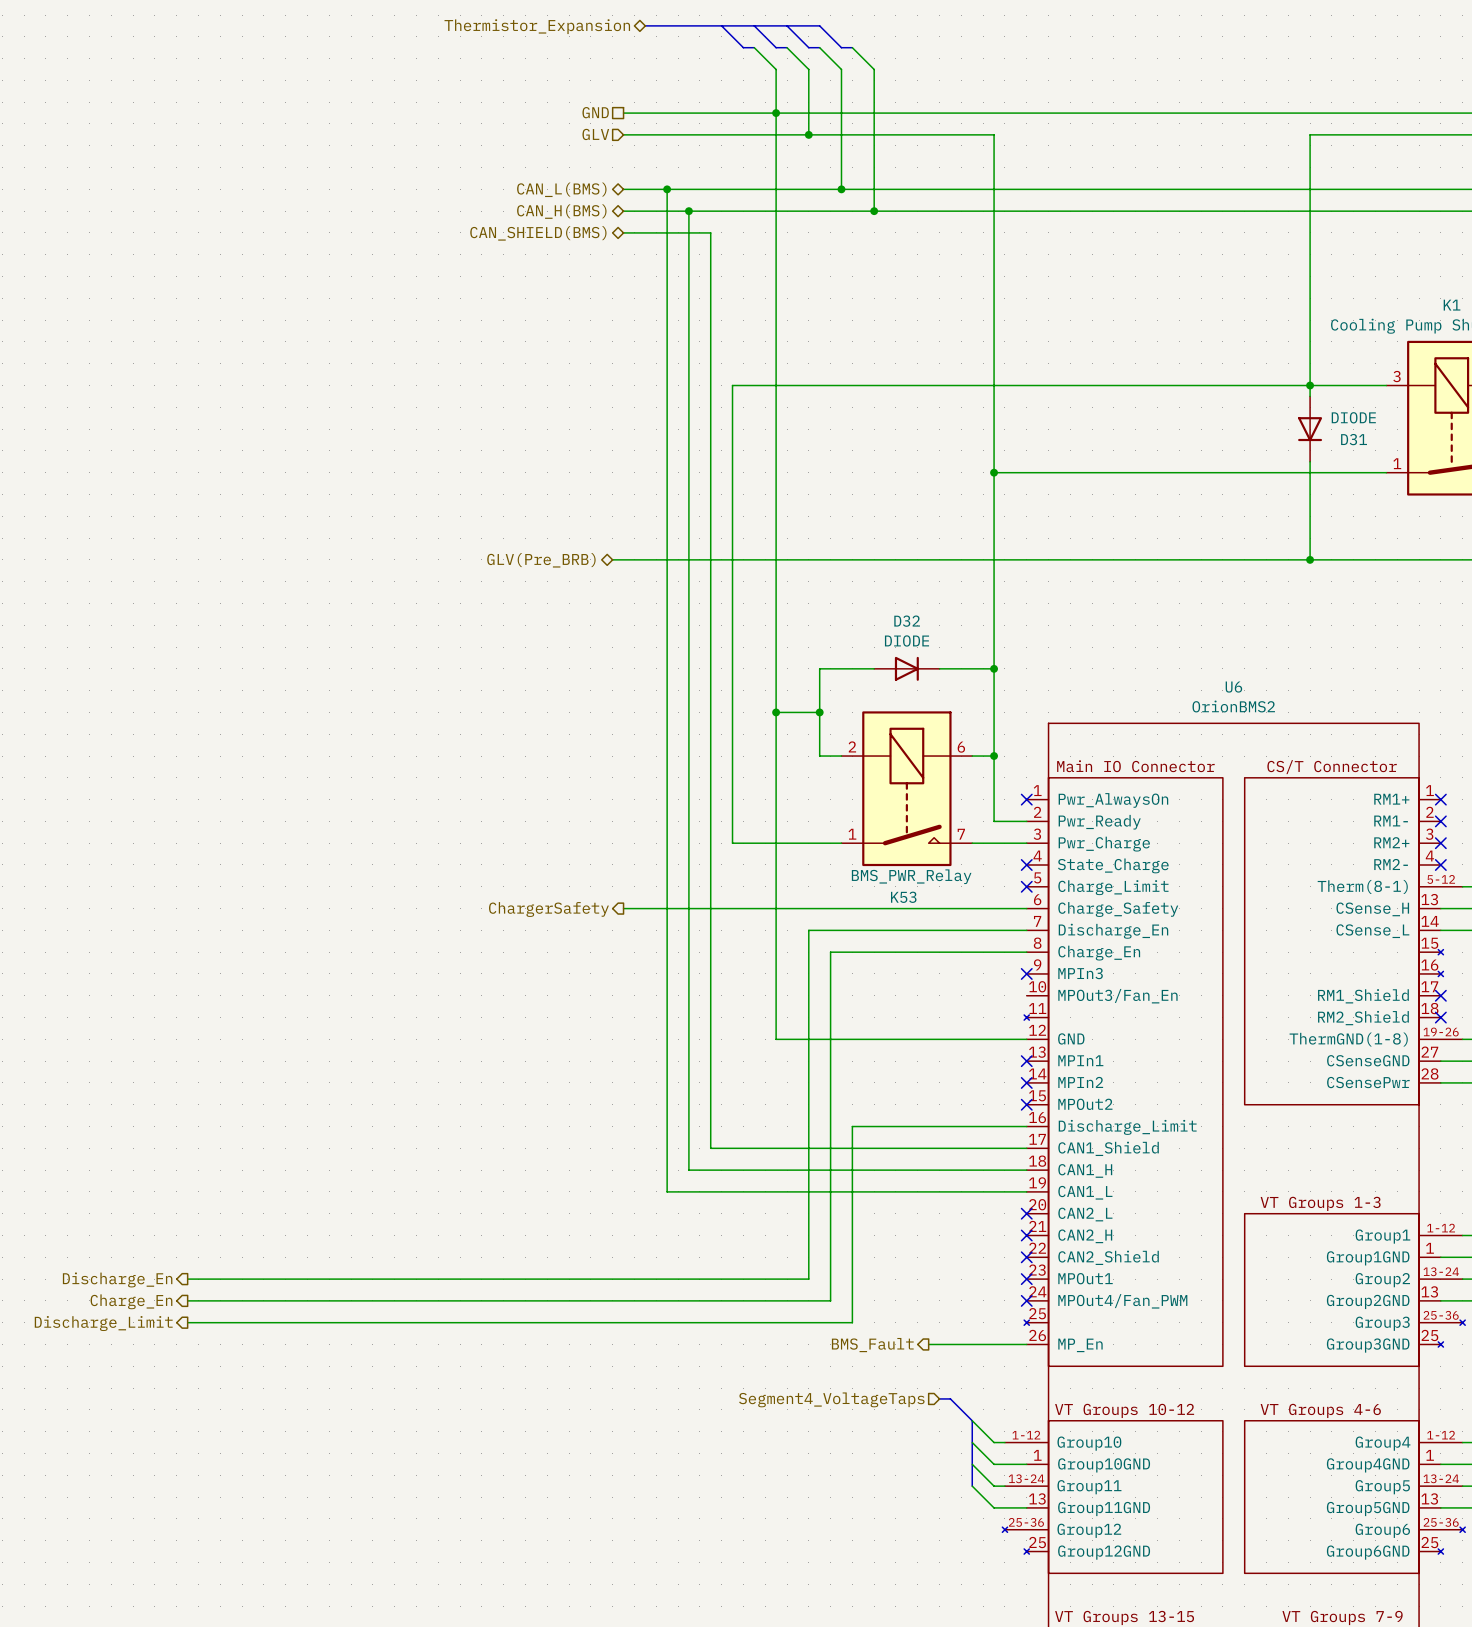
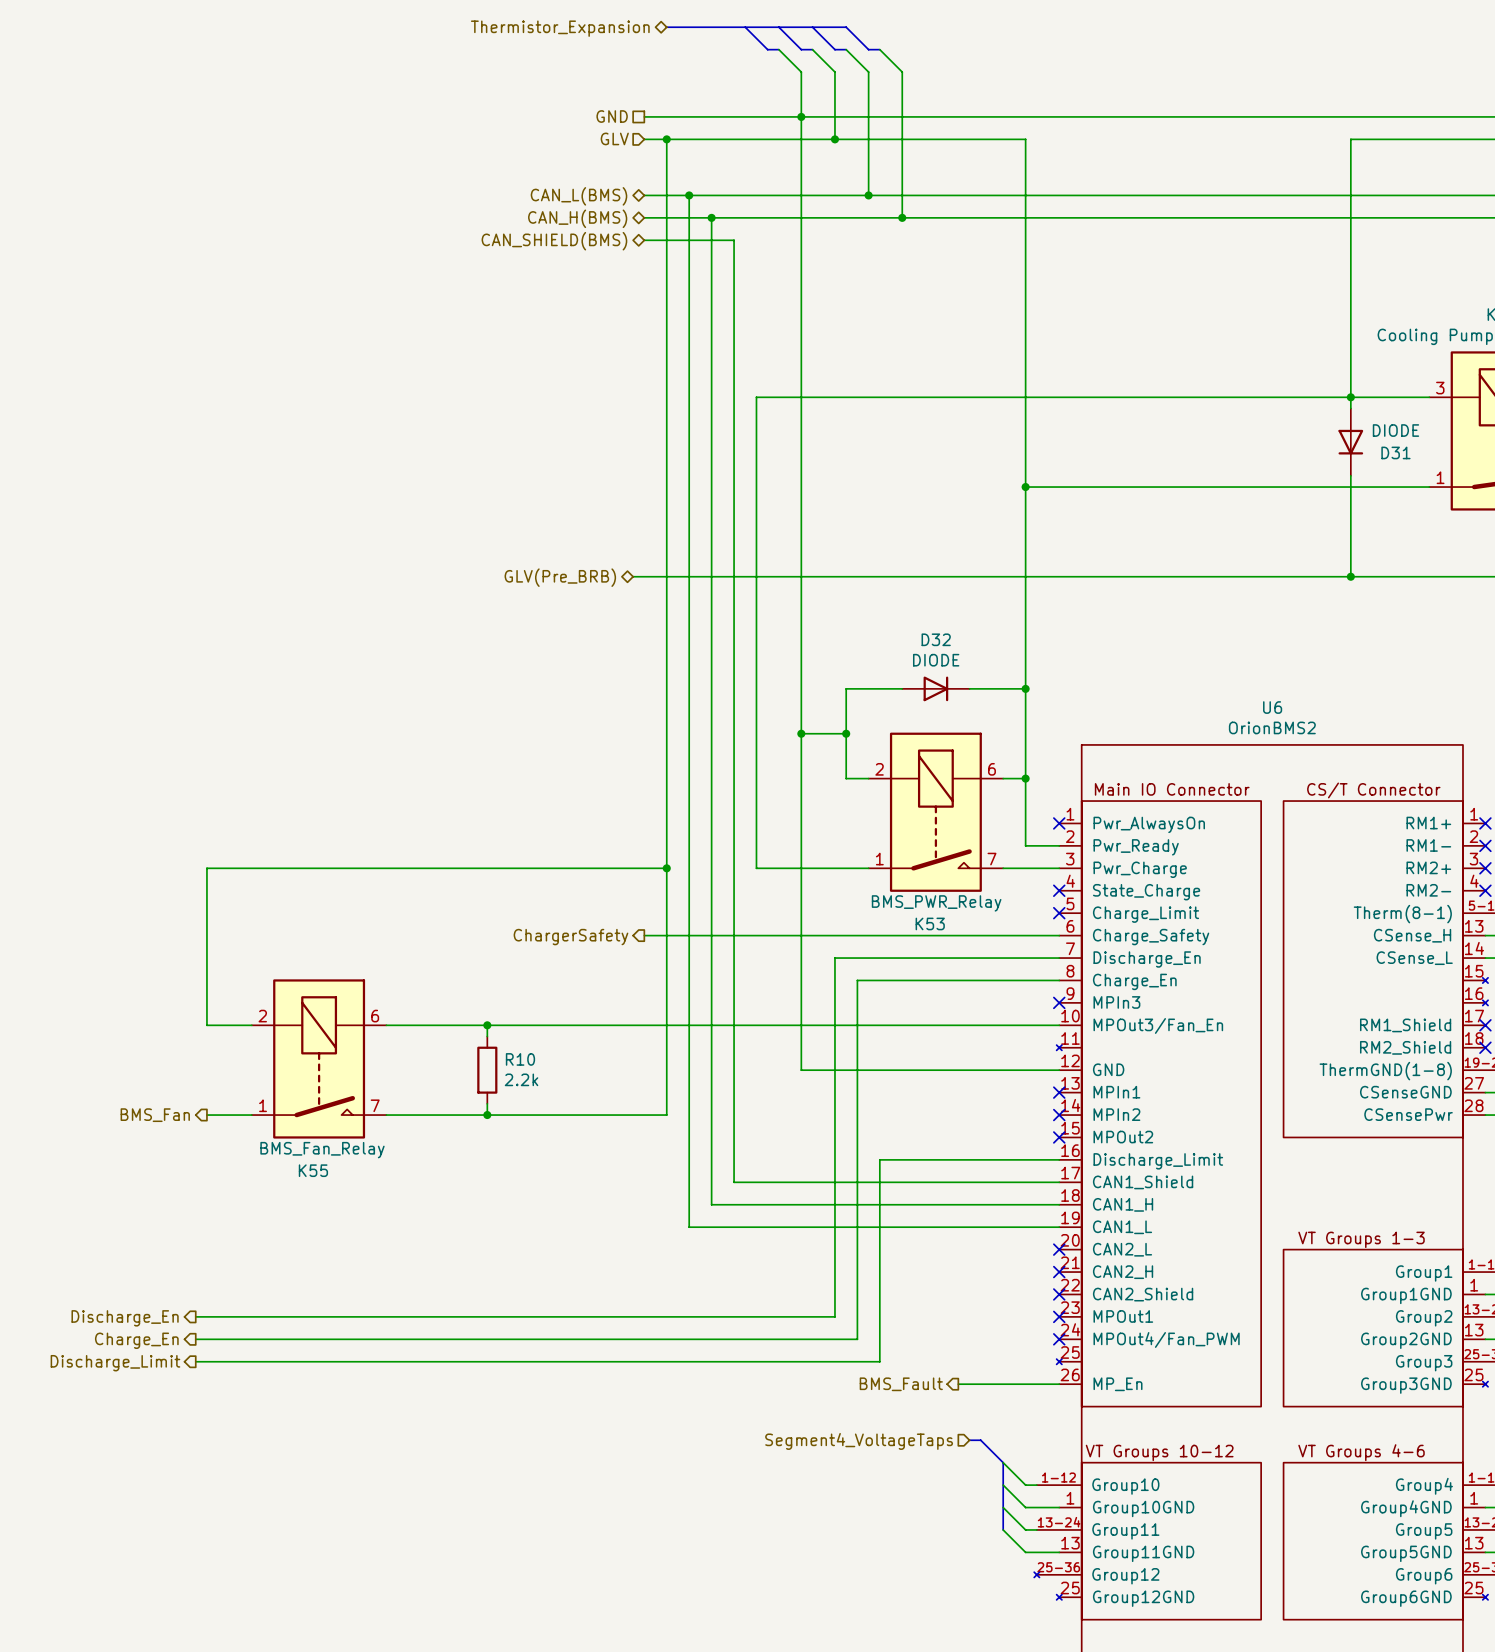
wire: none -> (666, 139) (666, 1115) (386, 1115)
junction: none -> (666, 139)
wire: none -> (666, 868) (206, 868) (206, 1025) (251, 1025)
junction: none -> (666, 868)
wire: none -> (386, 1025) (1059, 1025)
wire: none -> (487, 1025) (487, 1036)
junction: none -> (487, 1025)
K55: none -> BMS_Fan_Relay (319, 1058)
R10: none -> 2.2k (487, 1070)
wire: none -> (487, 1103) (487, 1115)
wire: none -> (206, 1115) (251, 1115)
junction: none -> (487, 1115)
hierarchical label: none -> BMS_Fan (155, 1115)

